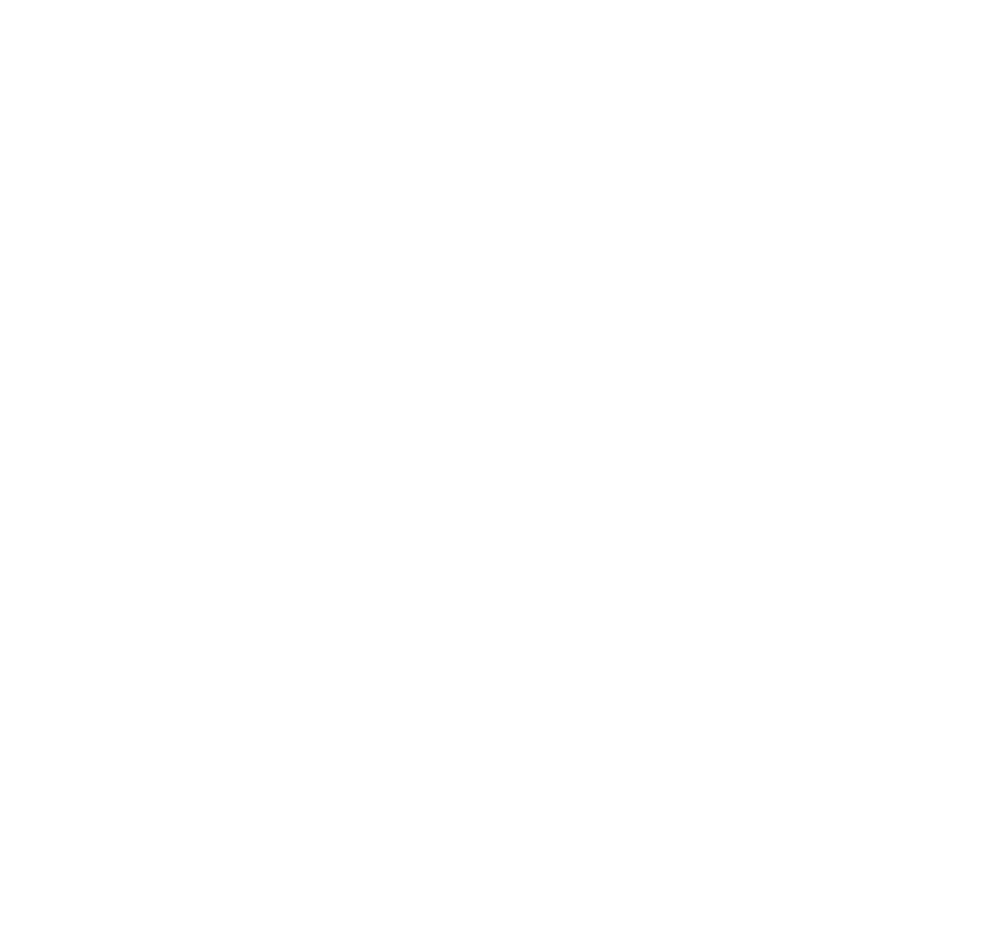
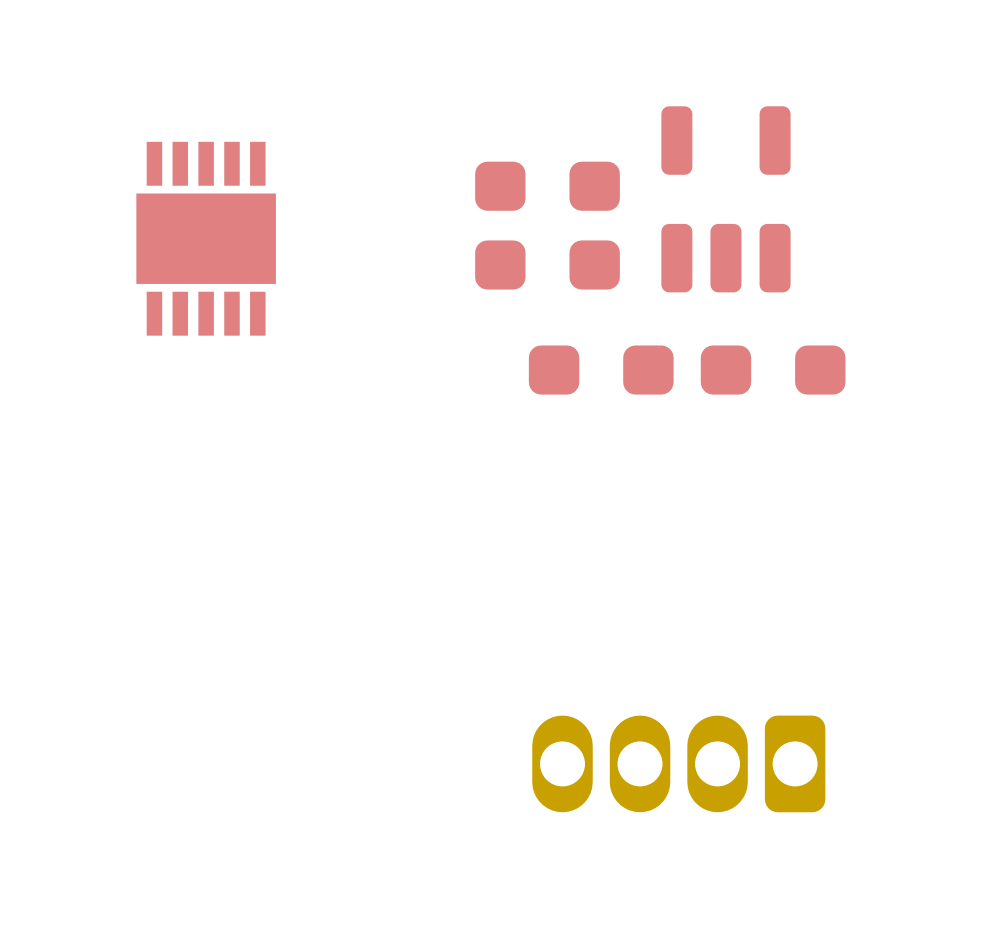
part: none -> (547, 186)
part: none -> (725, 199)
part: none -> (206, 238)
part: none -> (547, 264)
part: none -> (601, 370)
part: none -> (773, 370)
part: none -> (678, 763)

